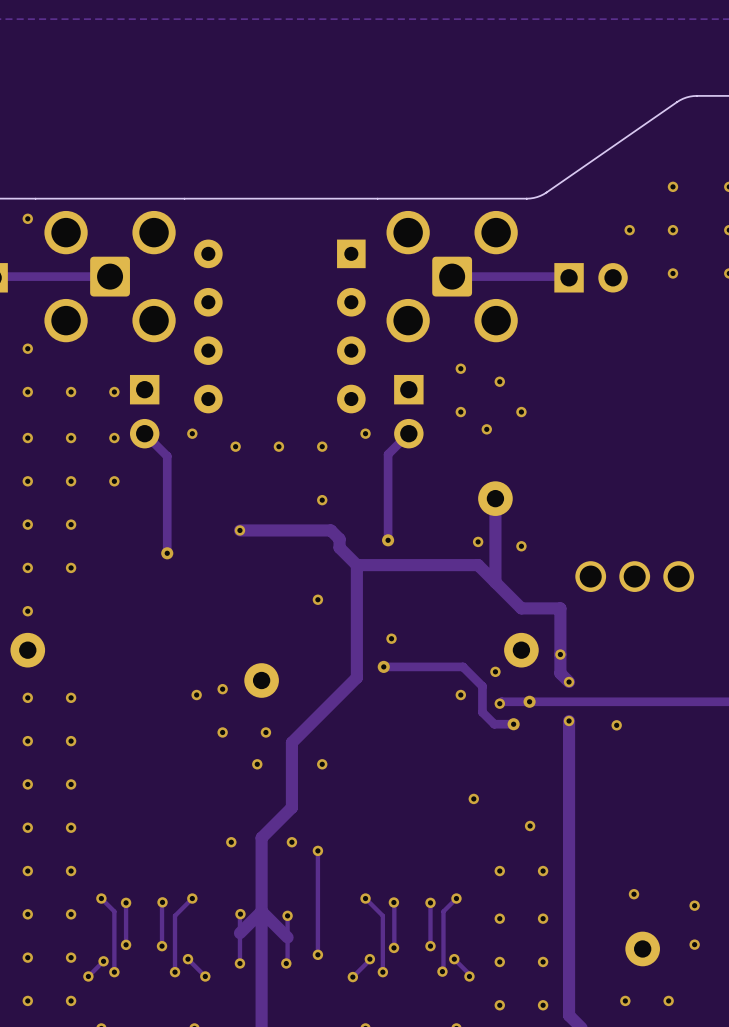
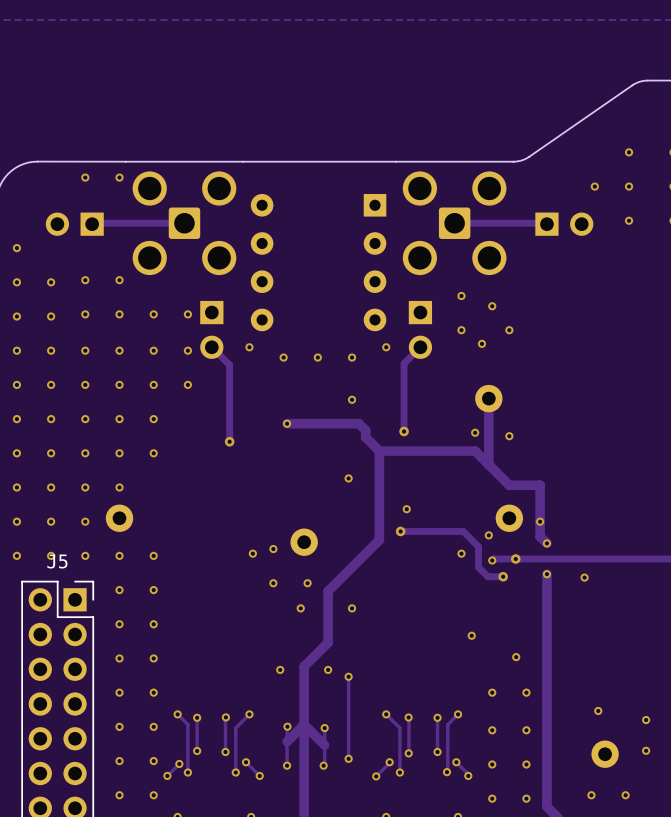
part: (634, 576) -> none

